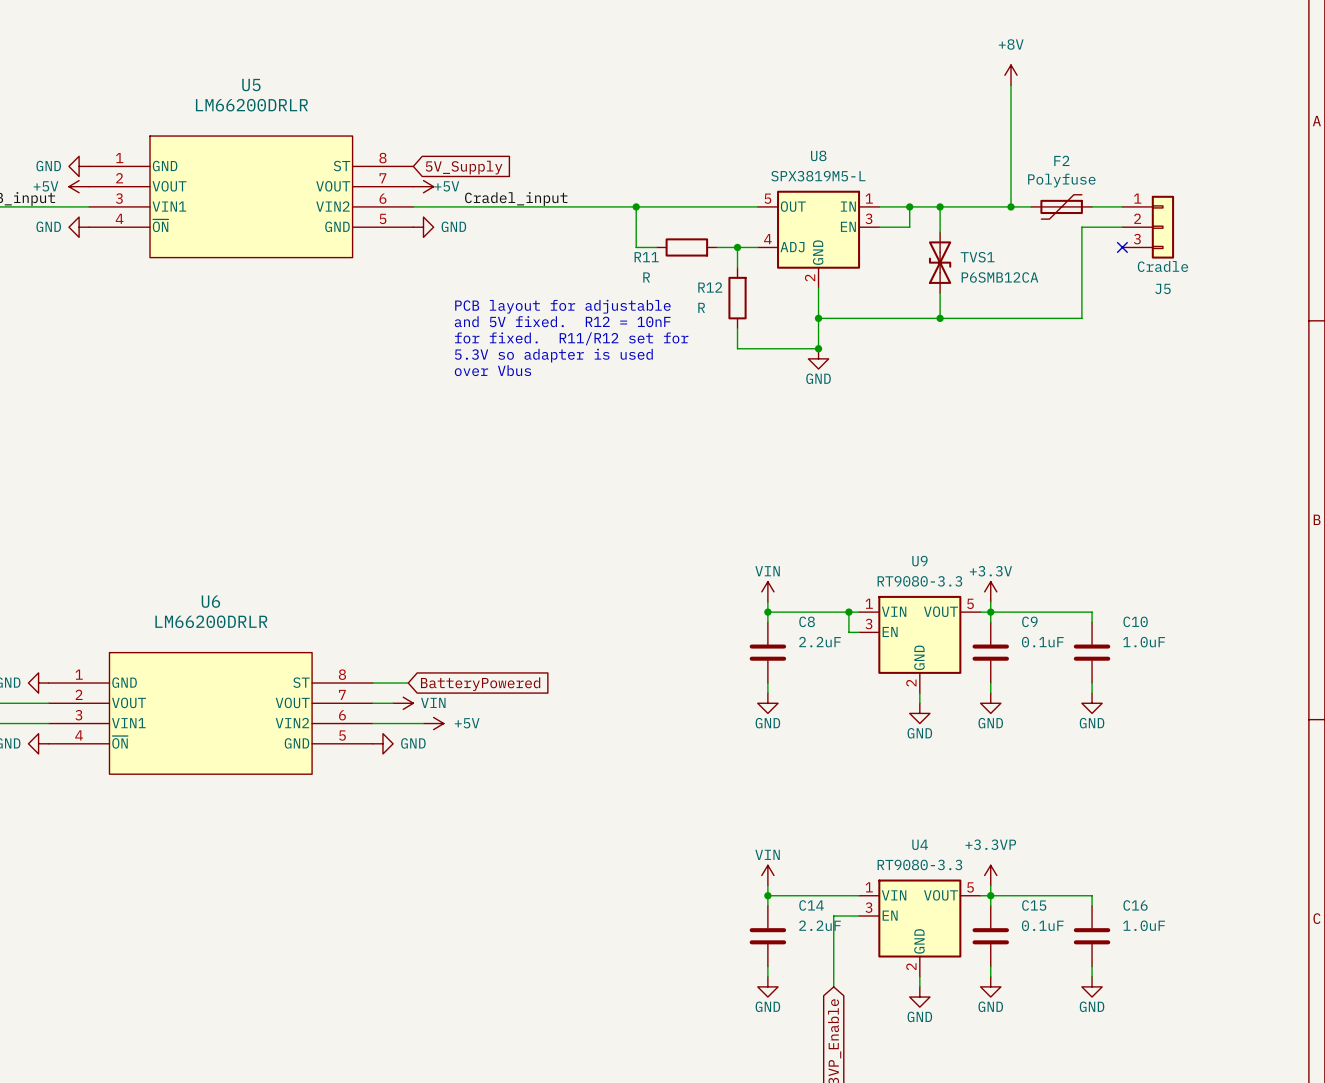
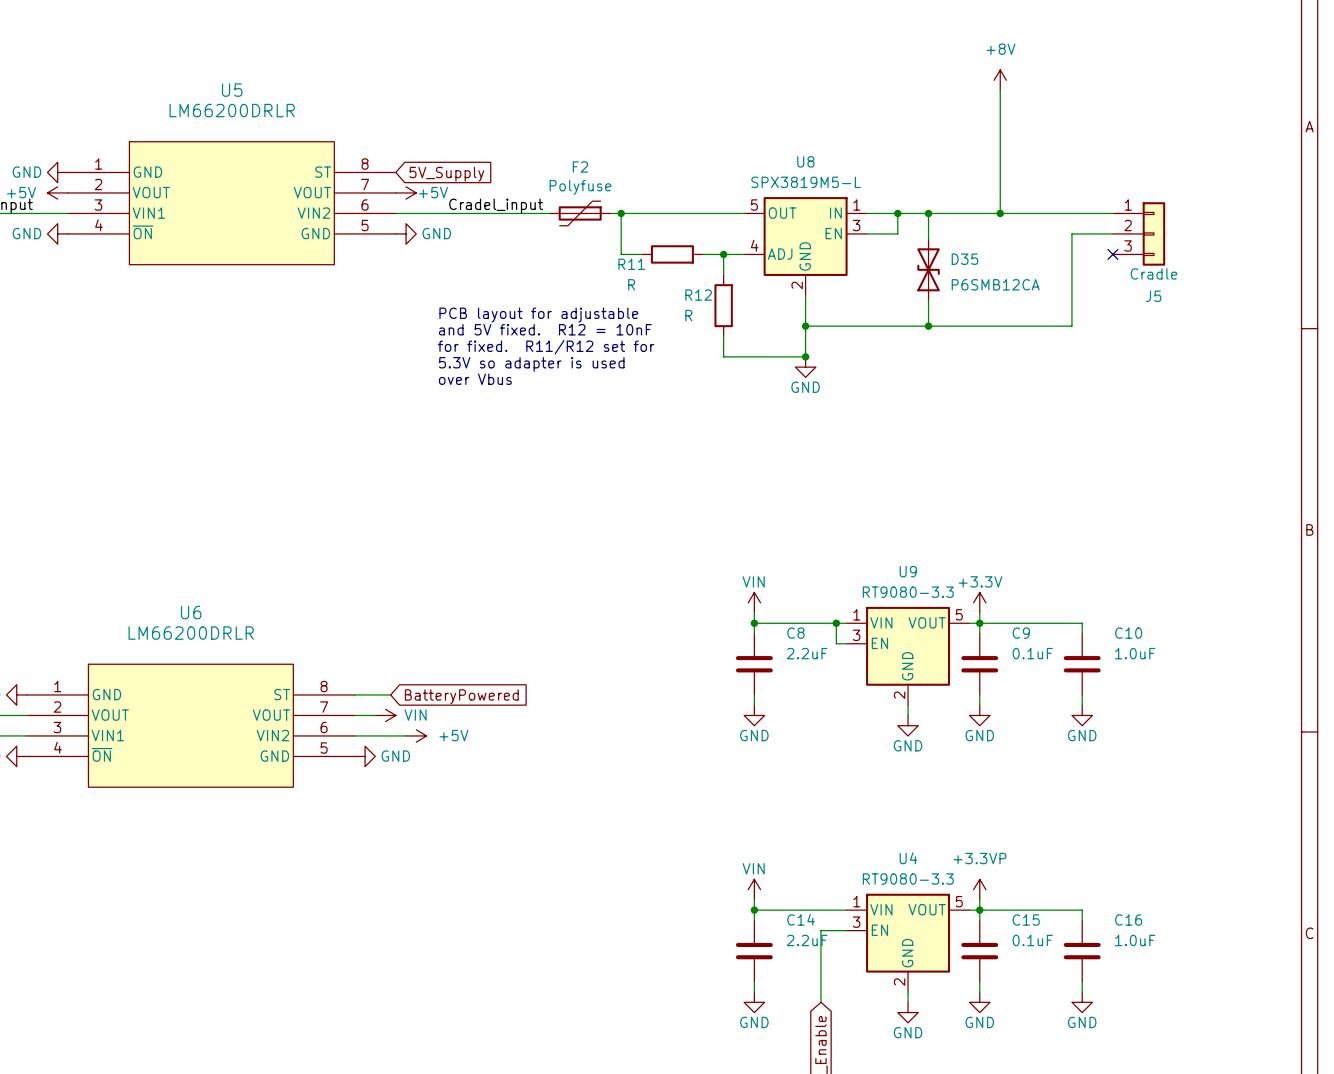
F2 position: (1061, 206) -> (580, 213)
TVS1 name: TVS1 (977, 257) -> D35 (964, 259)

